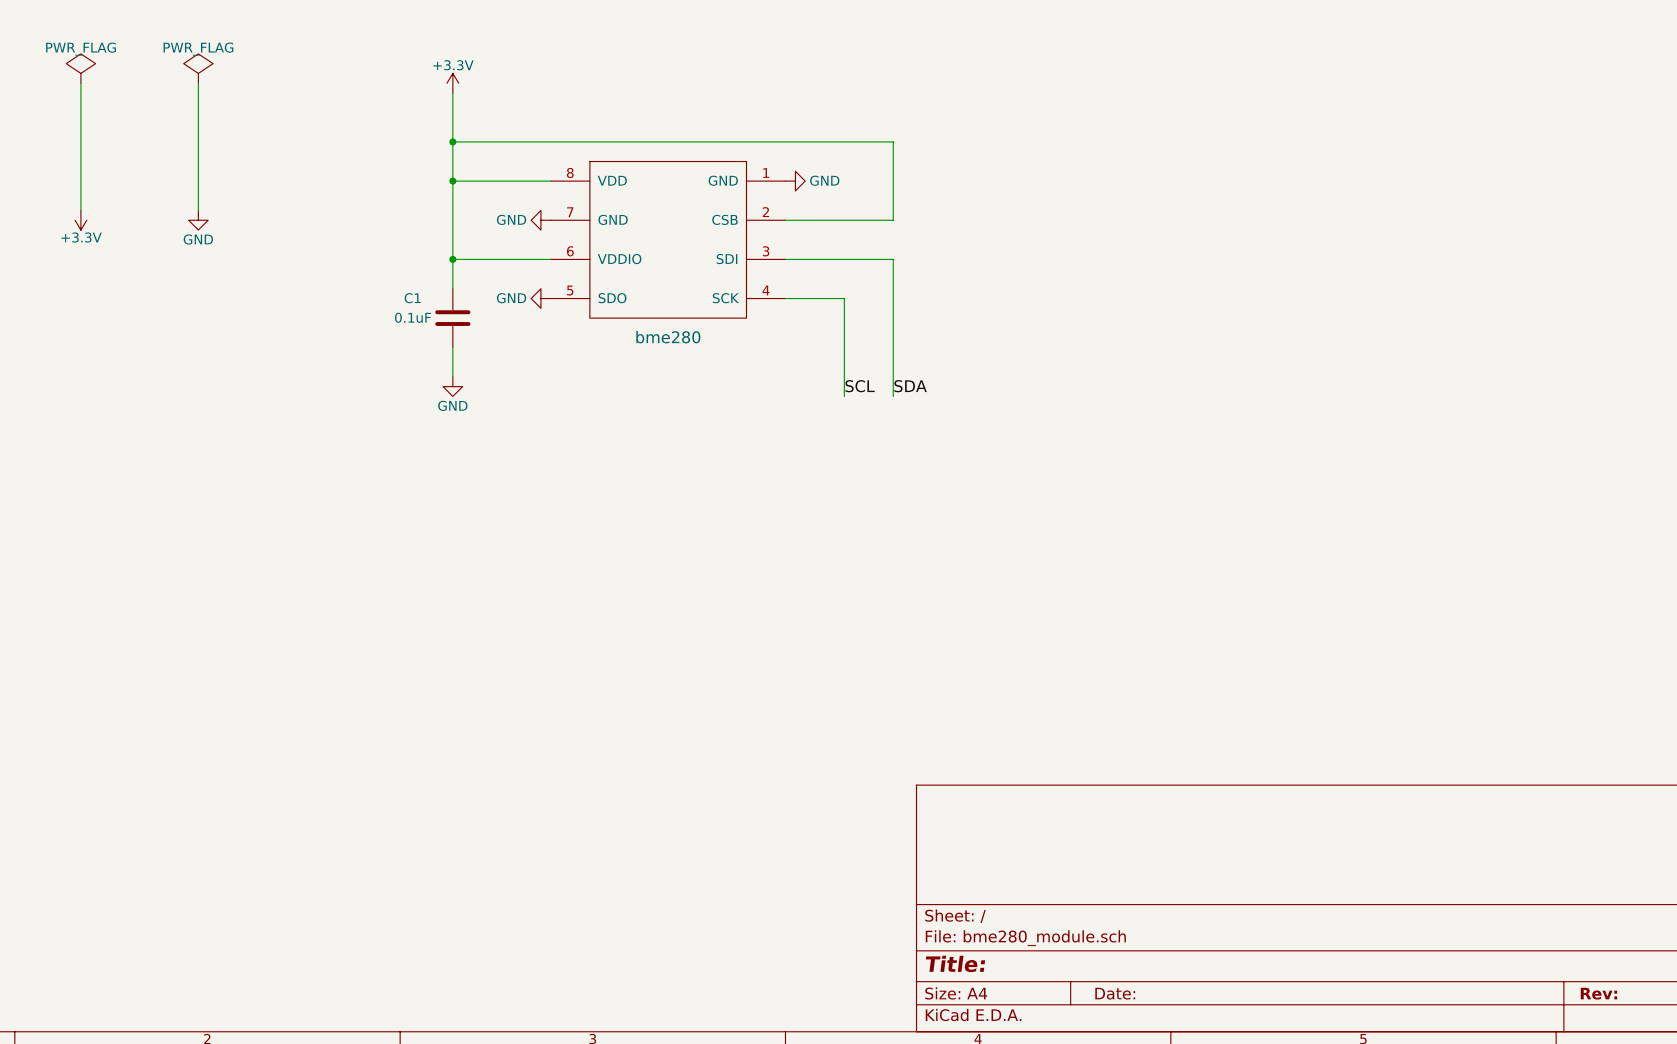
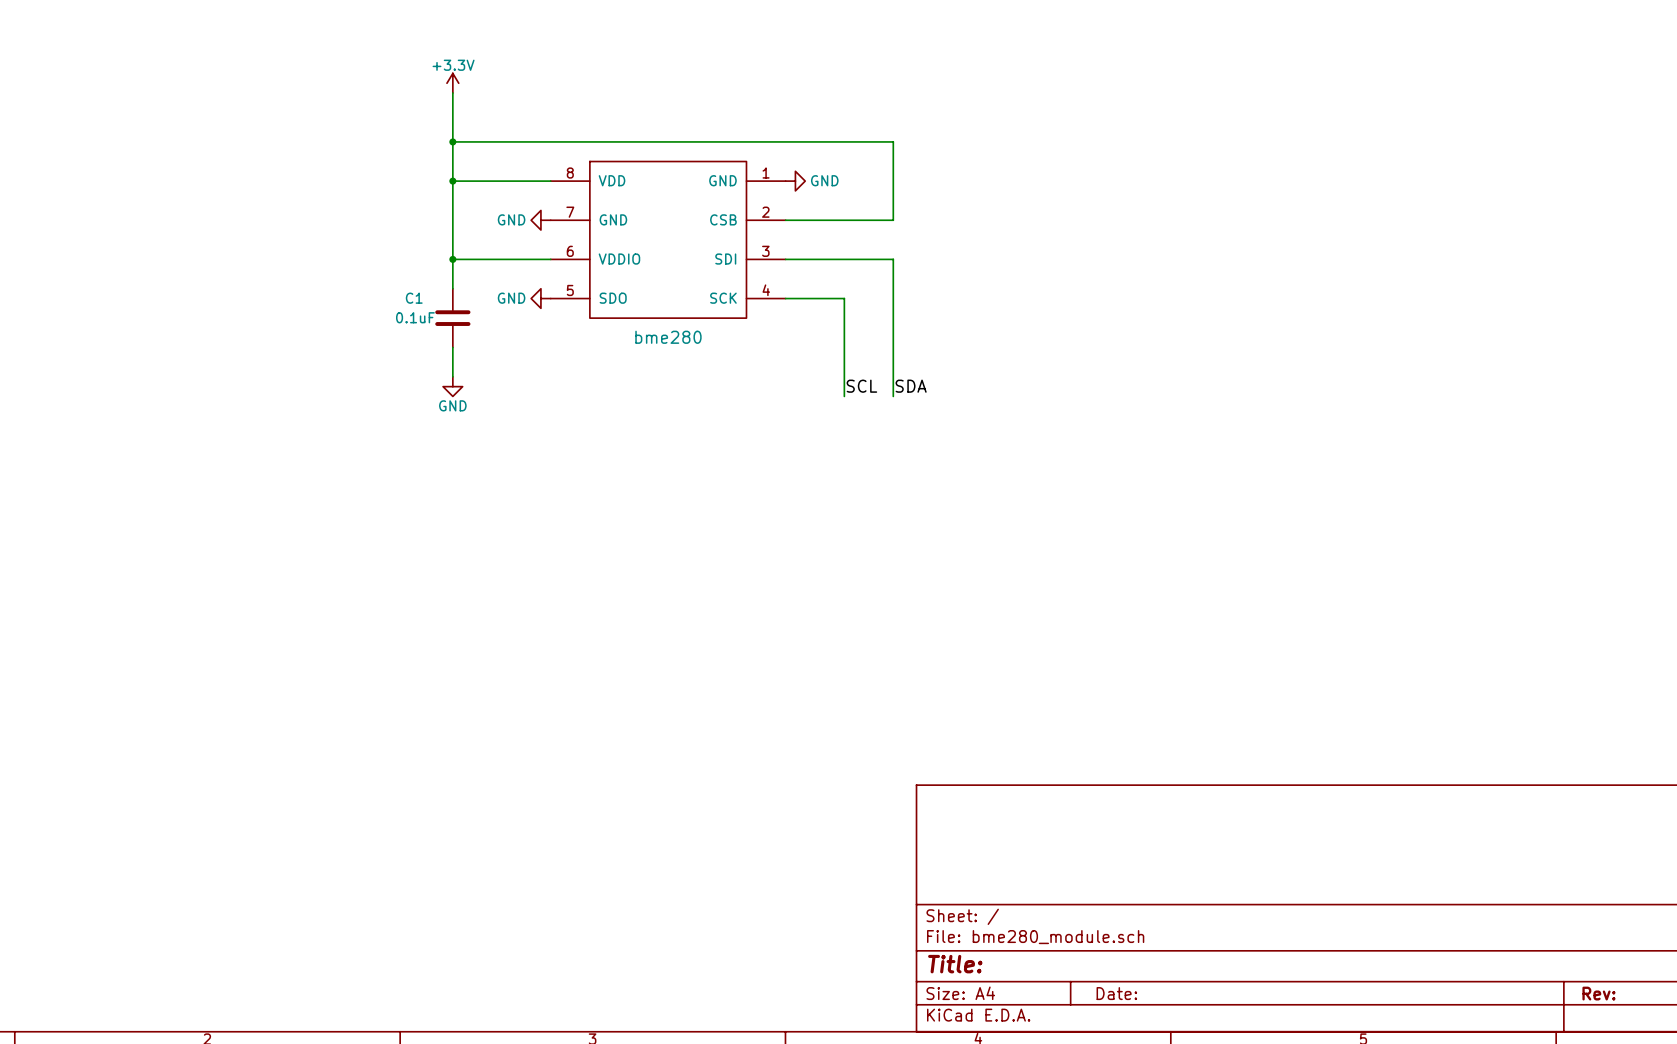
power symbol: PWR_FLAG (80, 68) -> none
power symbol: PWR_FLAG (198, 68) -> none
wire: (80, 83) (80, 210) -> none
wire: (198, 83) (198, 210) -> none
power symbol: +3.3V (80, 220) -> none
power symbol: GND (198, 220) -> none

